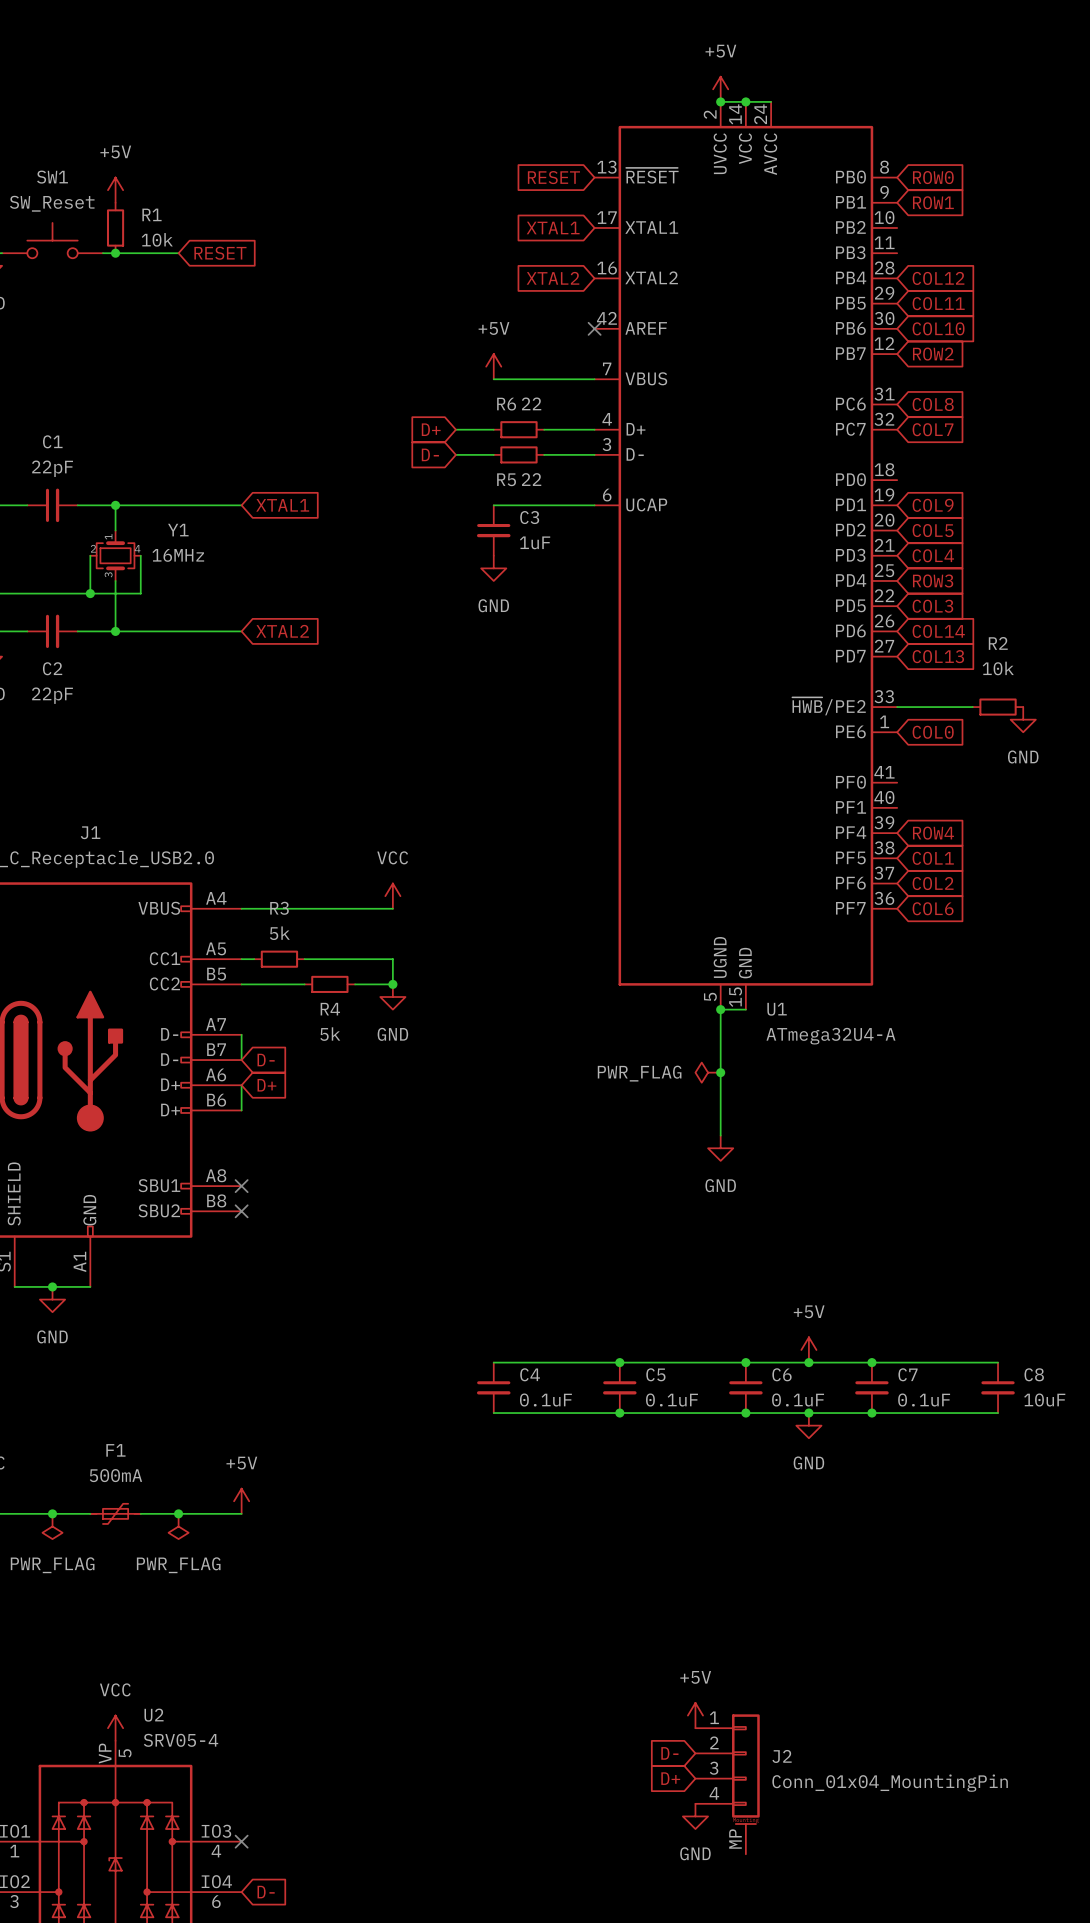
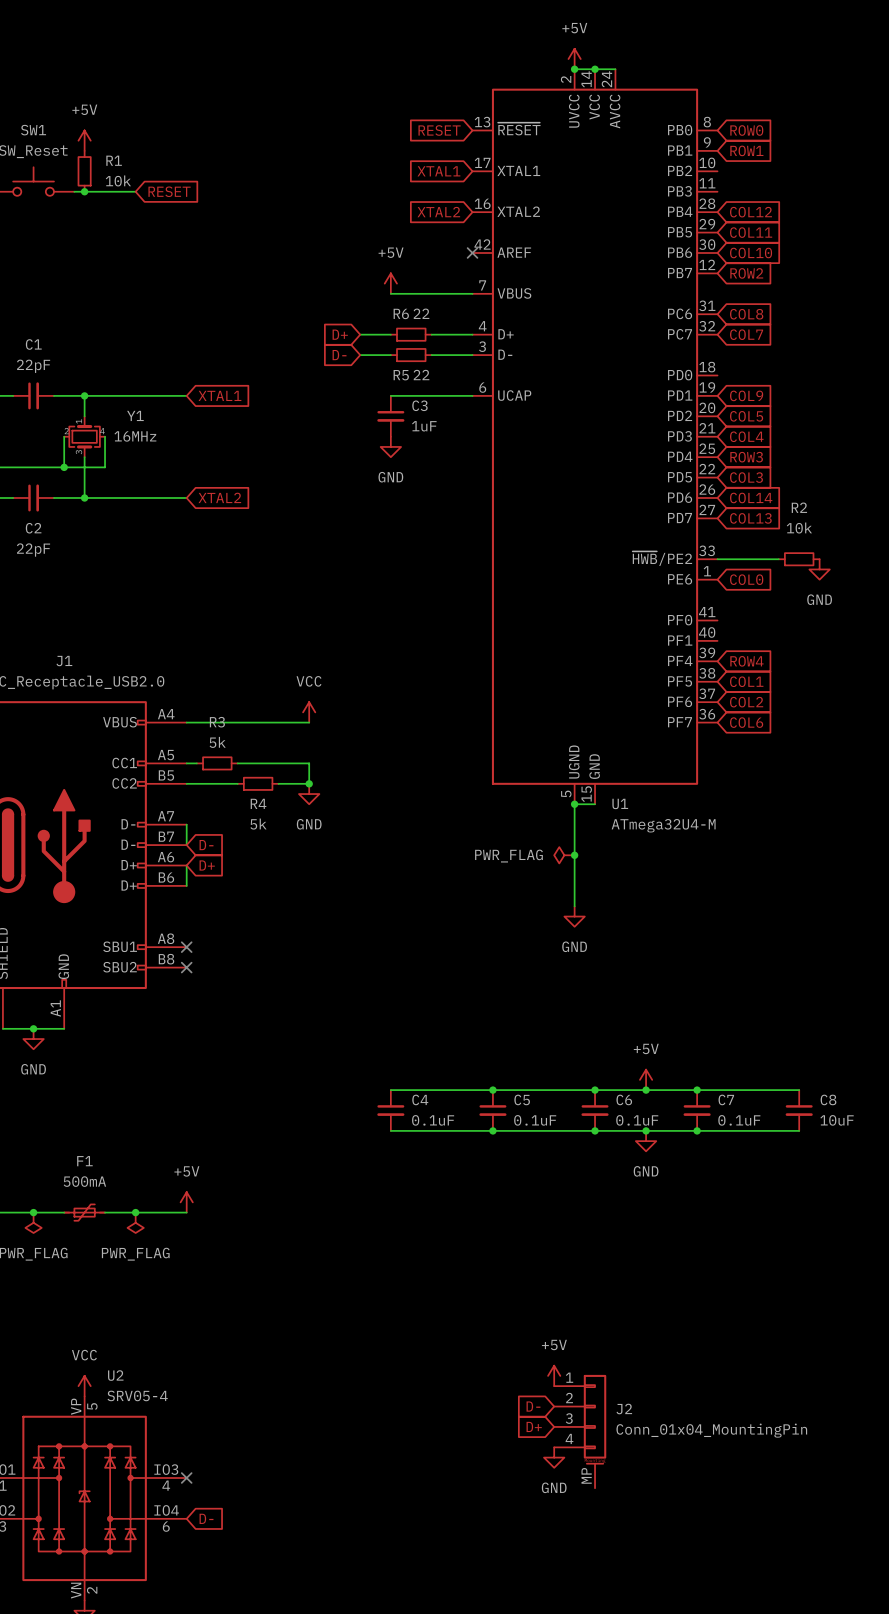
U1 value: ATmega32U4-A (830, 1036) -> ATmega32U4-M (663, 825)

